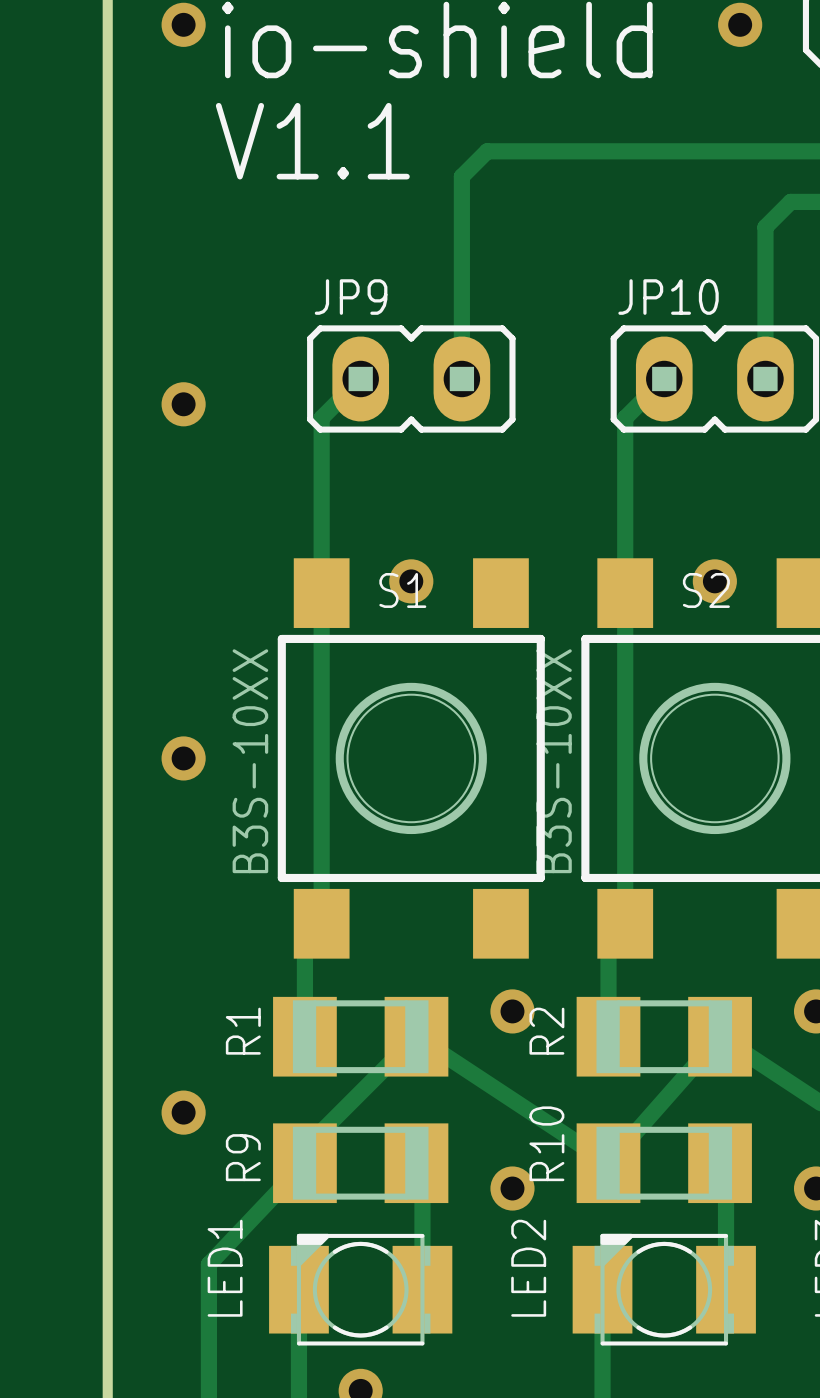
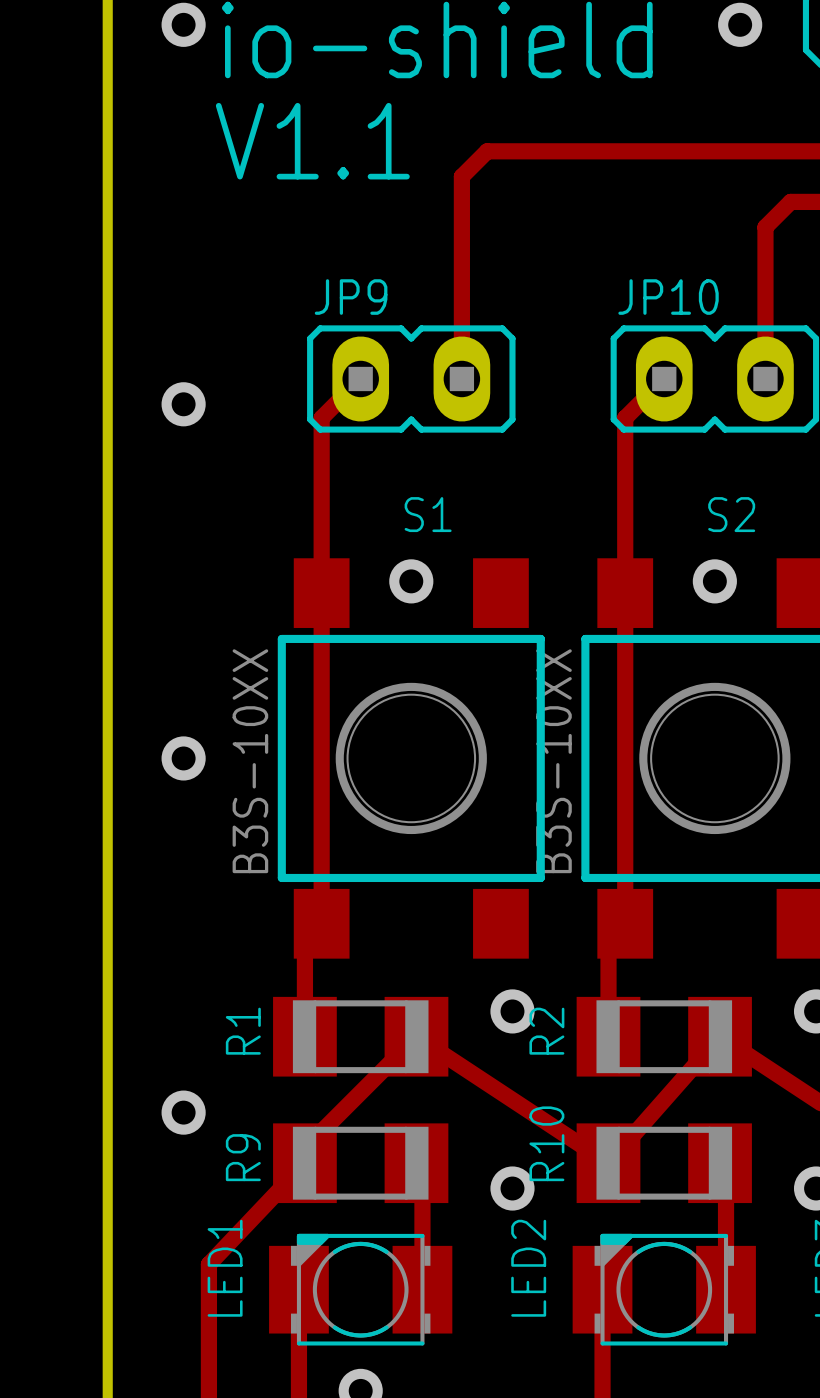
S1 name position: S1 (402, 590) -> S1 (428, 514)
S2 name position: S2 (706, 590) -> S2 (731, 514)

